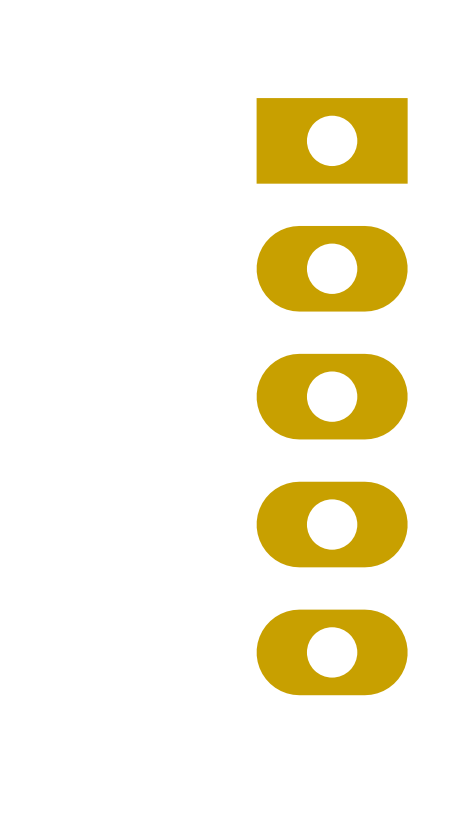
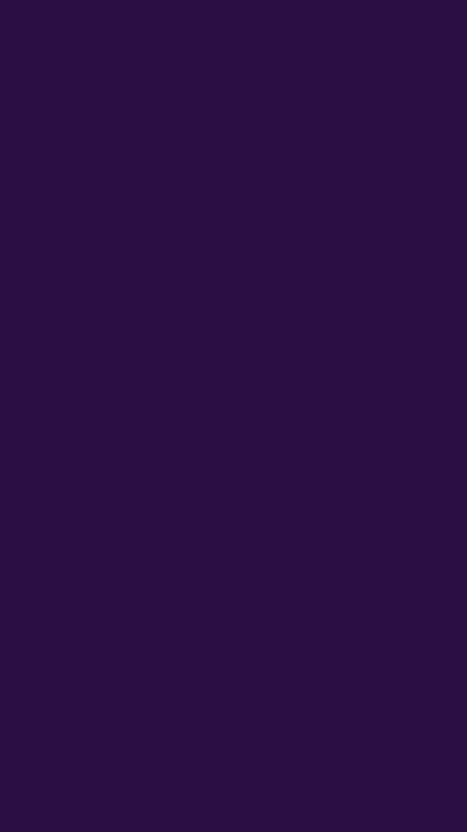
part: (332, 396) -> none

